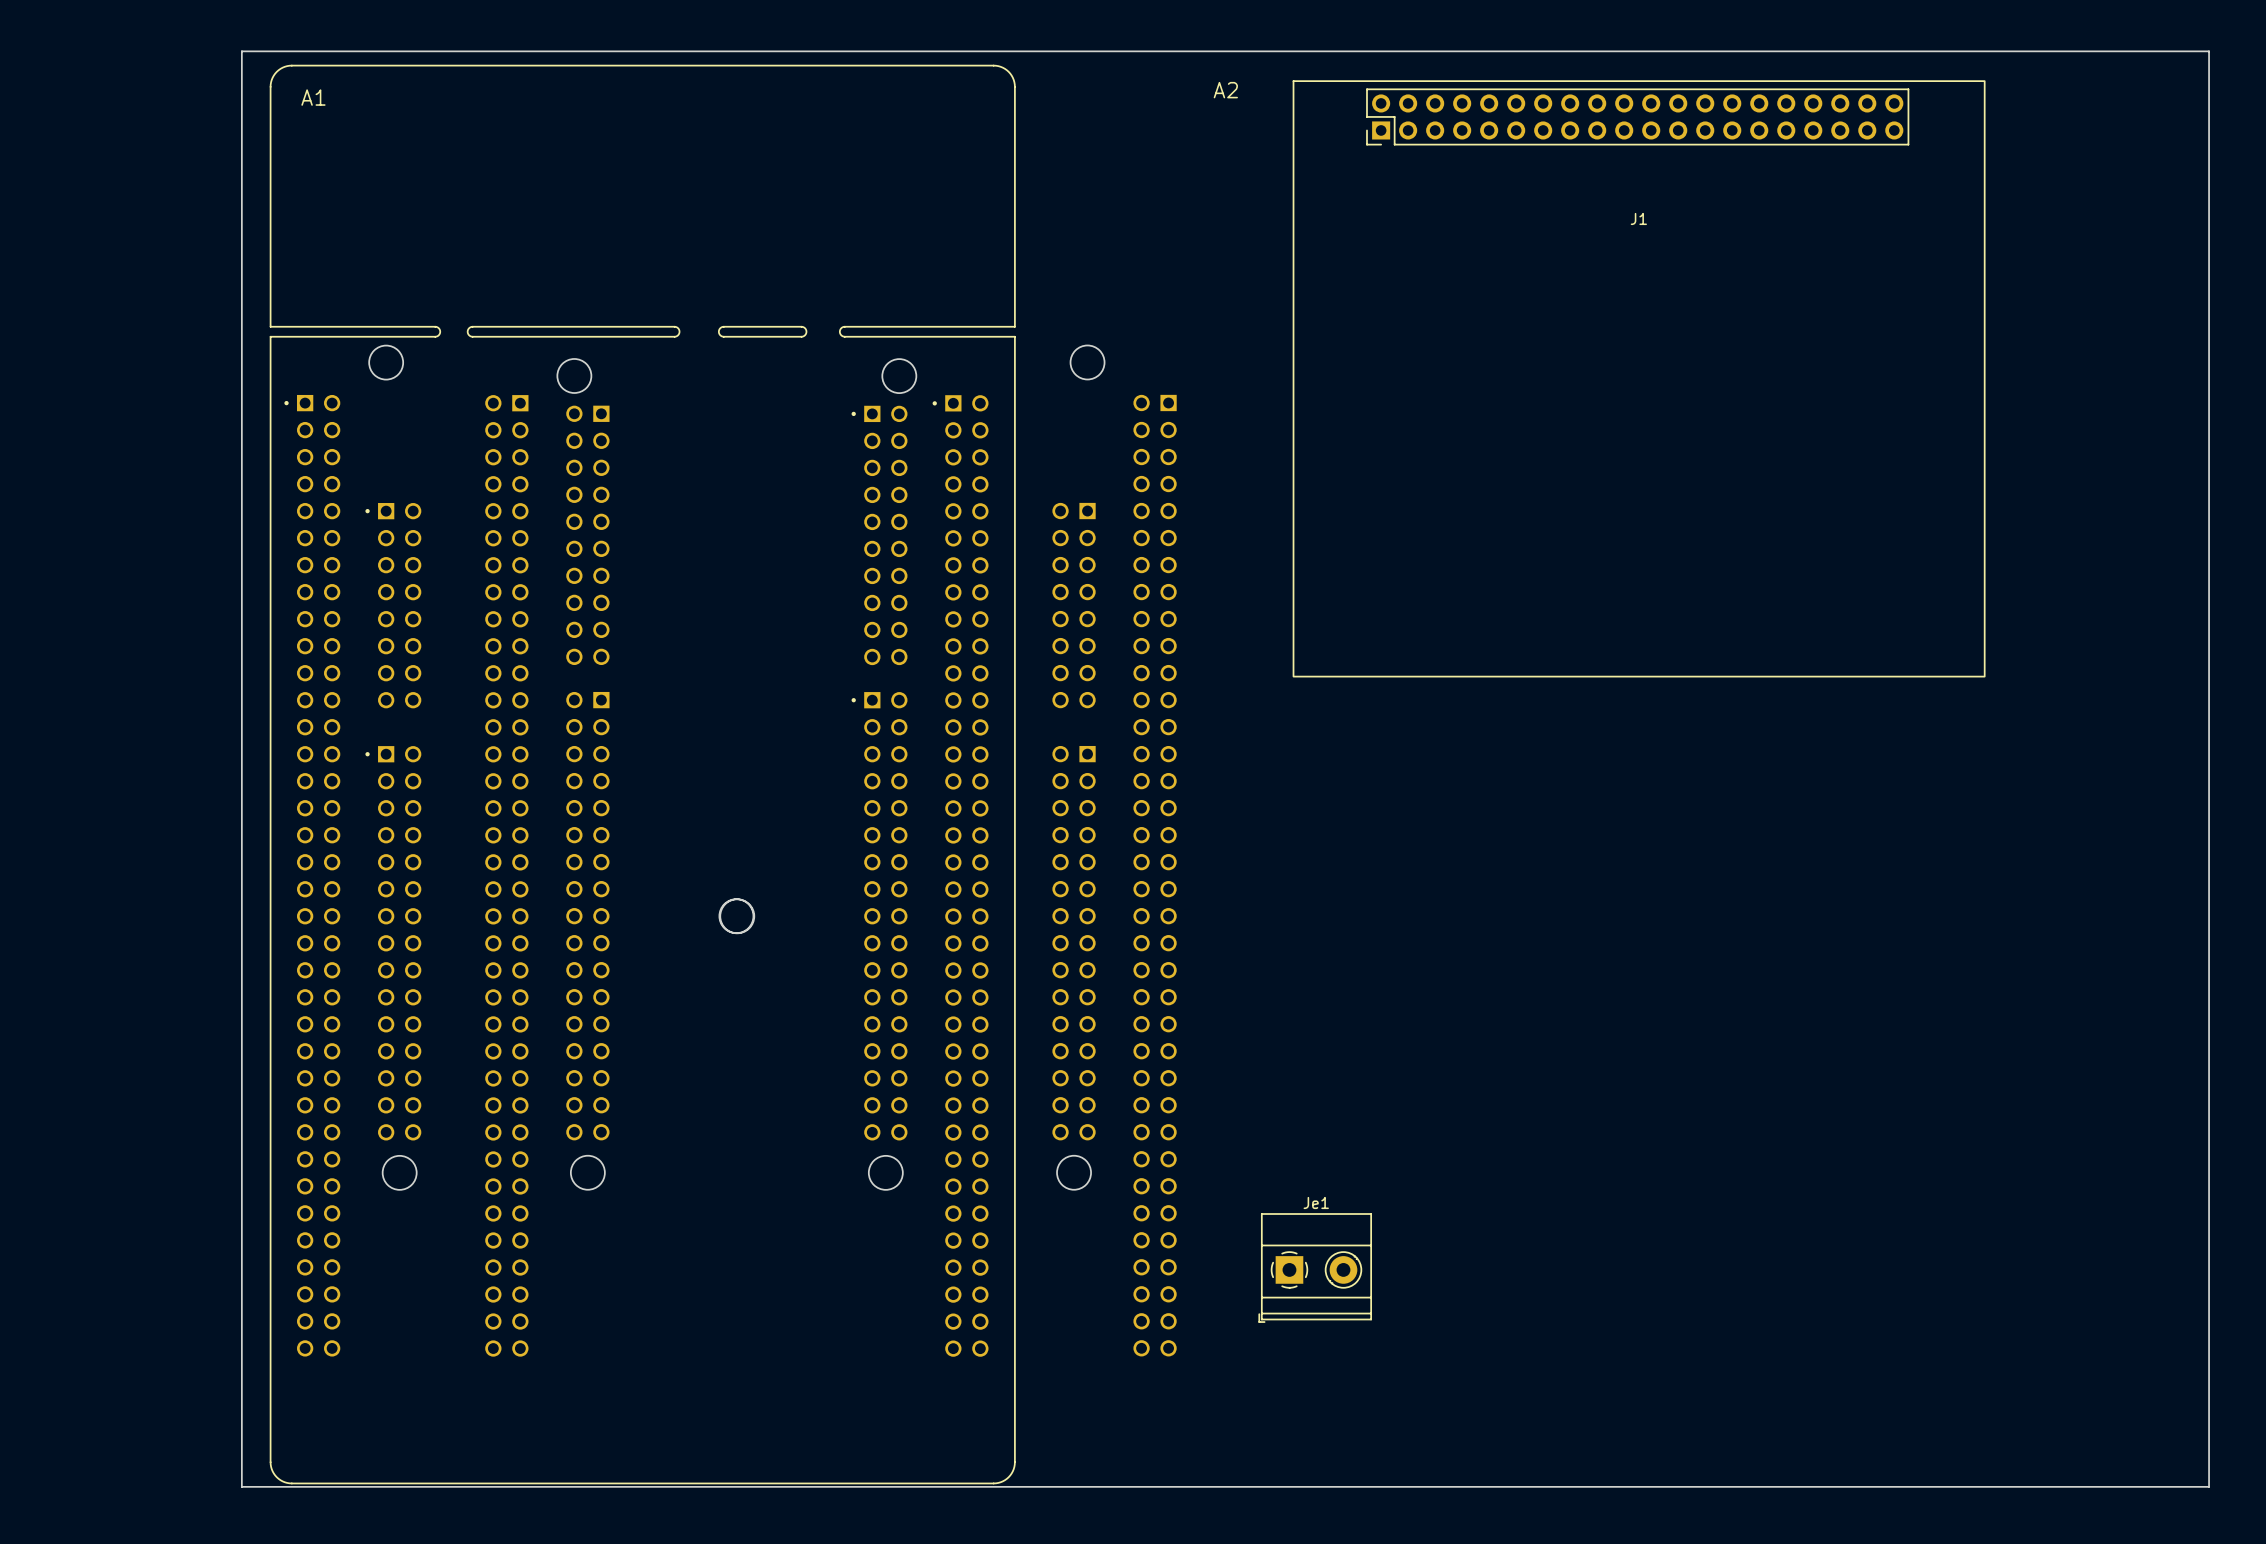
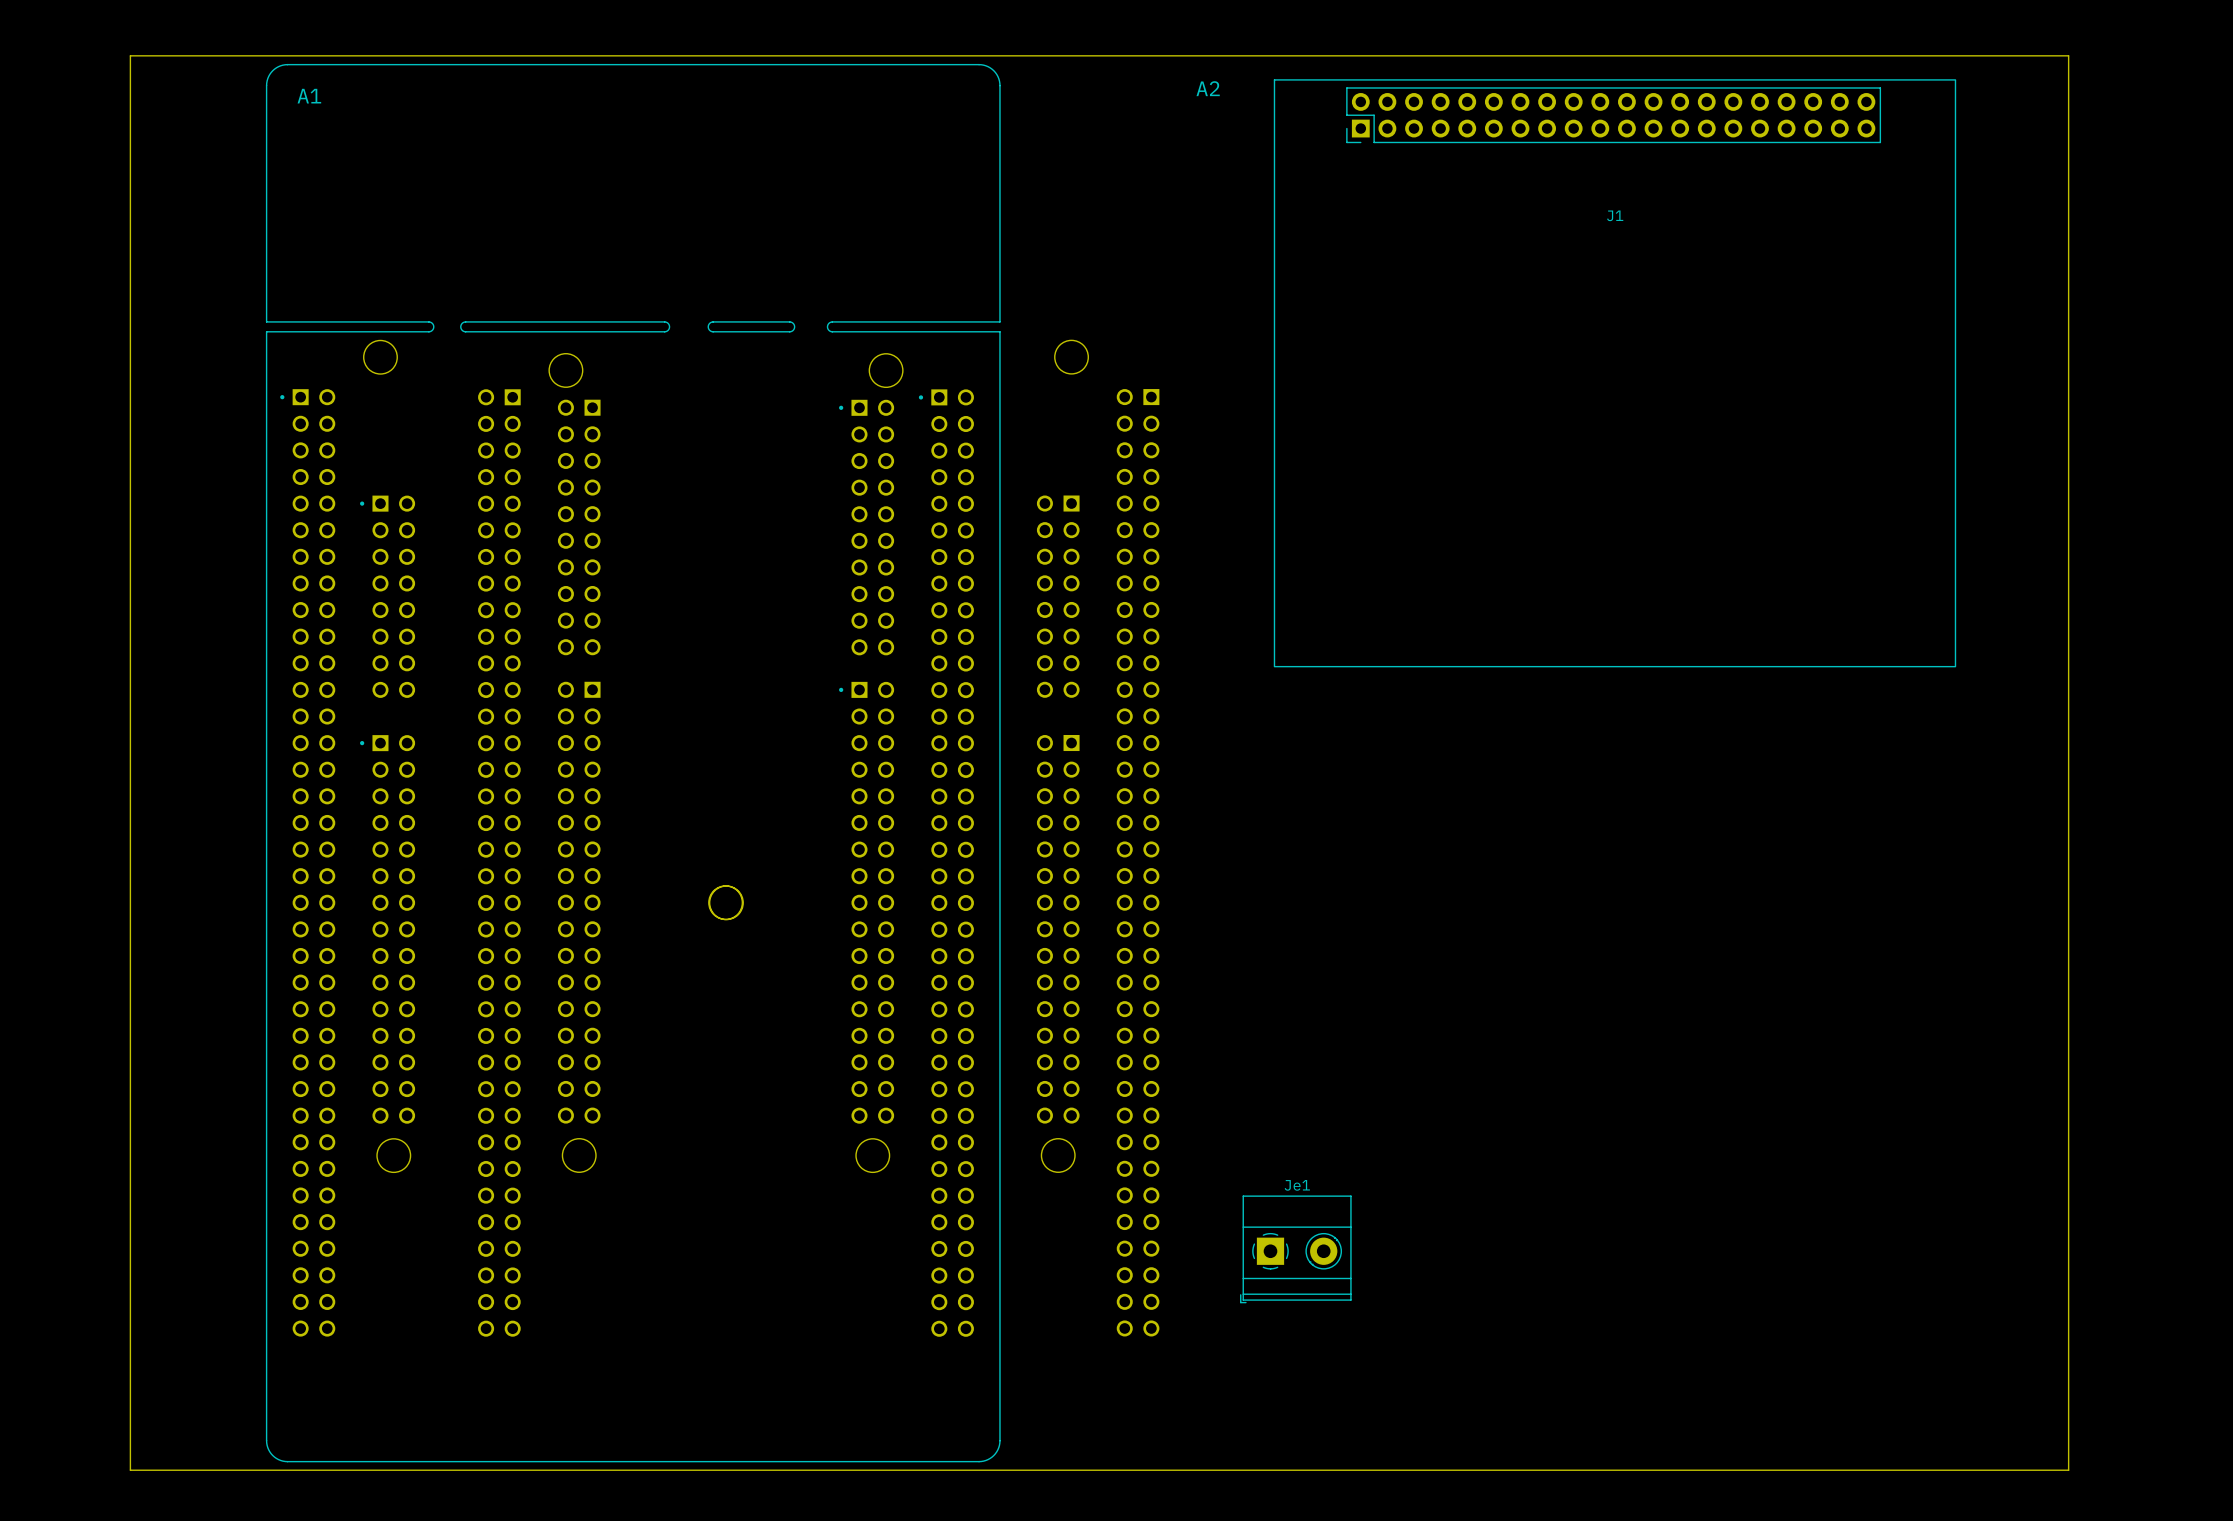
board edge: (241, 51) (2209, 51) (2209, 1486) (241, 1486) (241, 51) -> (130, 55) (130, 1470) (2068, 1470) (2068, 55) (130, 55)

